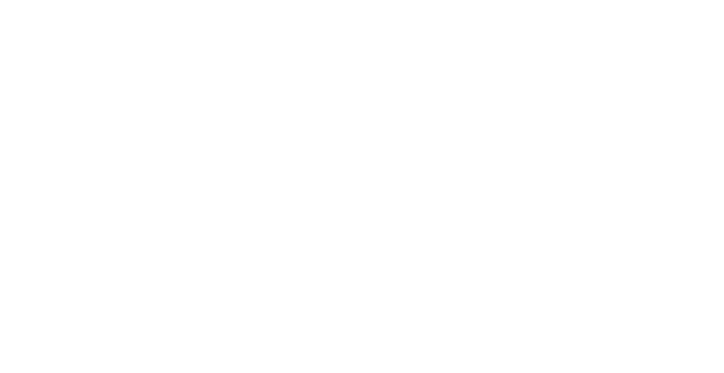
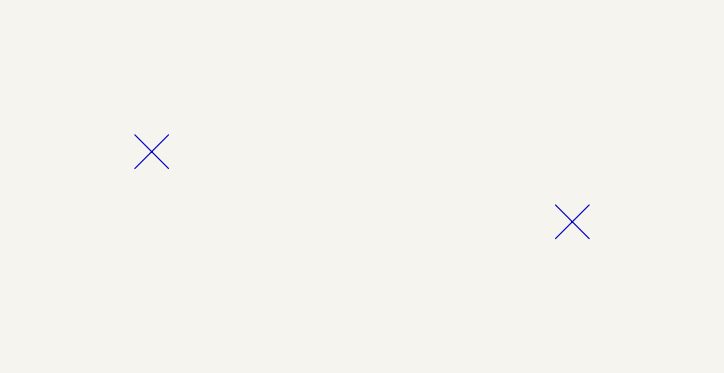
no-connect mark: none -> (151, 151)
no-connect mark: none -> (572, 221)

